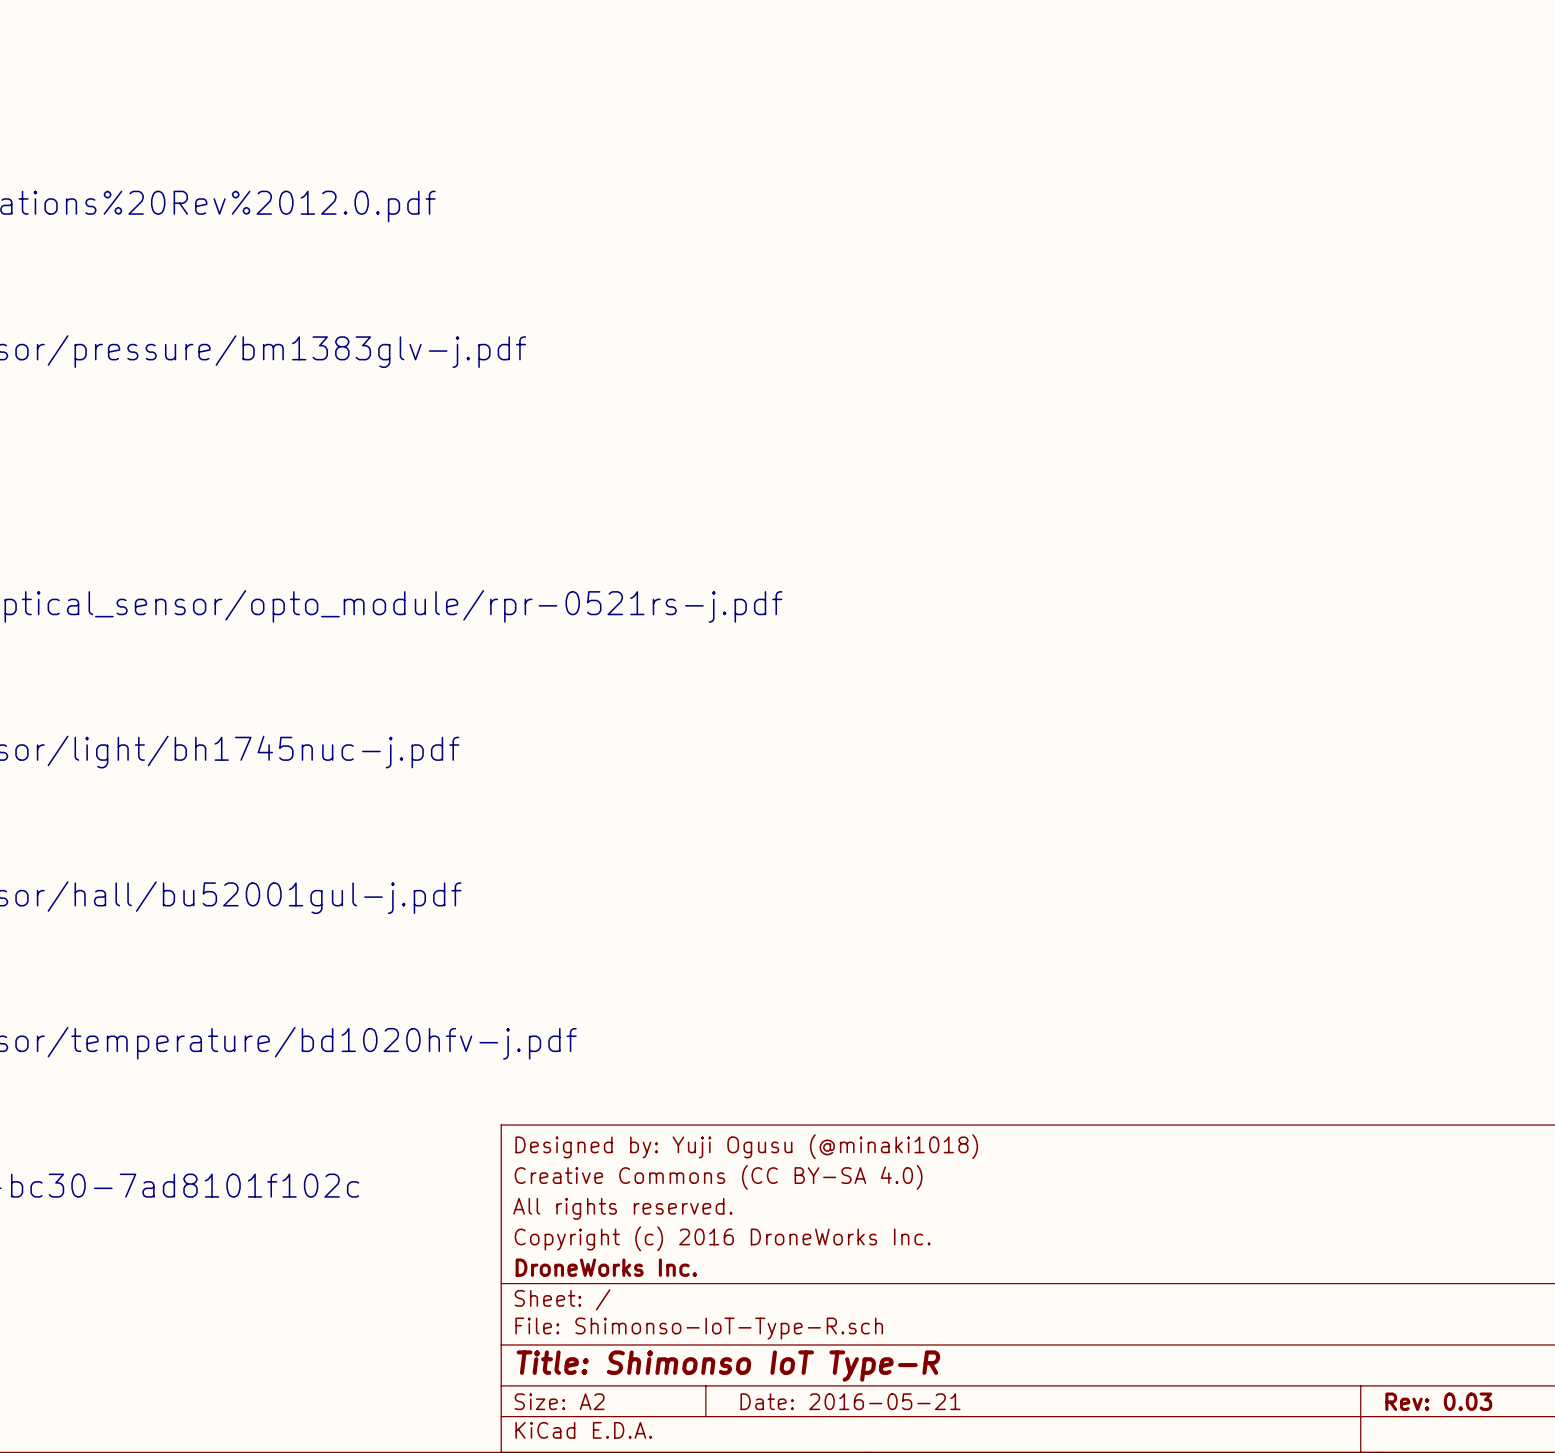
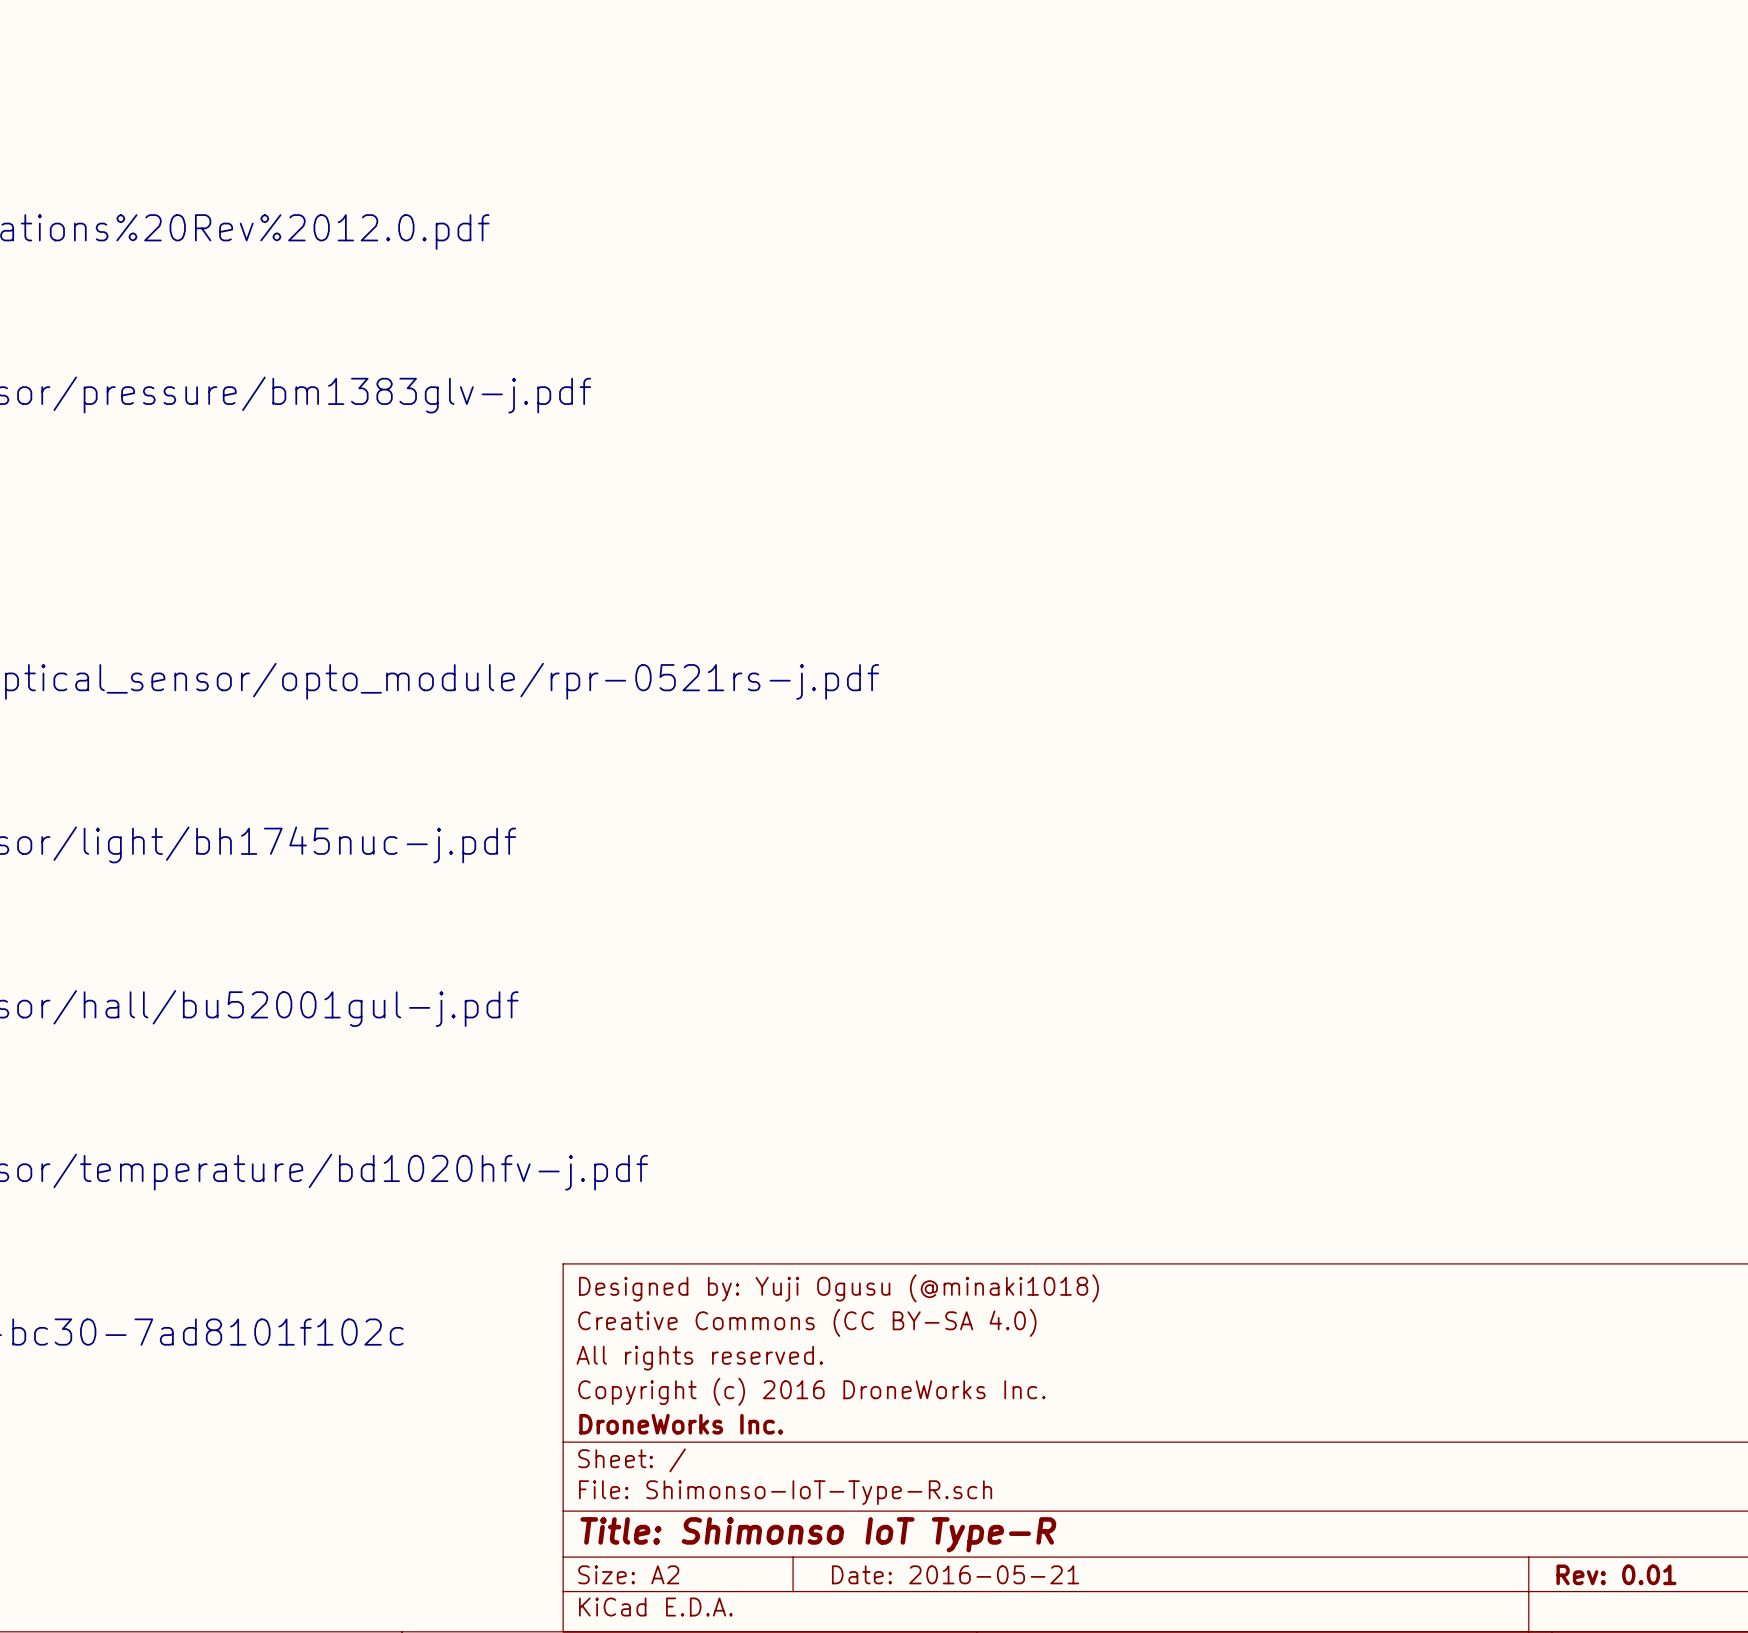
title block: Rev: 0.03 (1438, 1401) -> Rev: 0.01 (1616, 1574)

